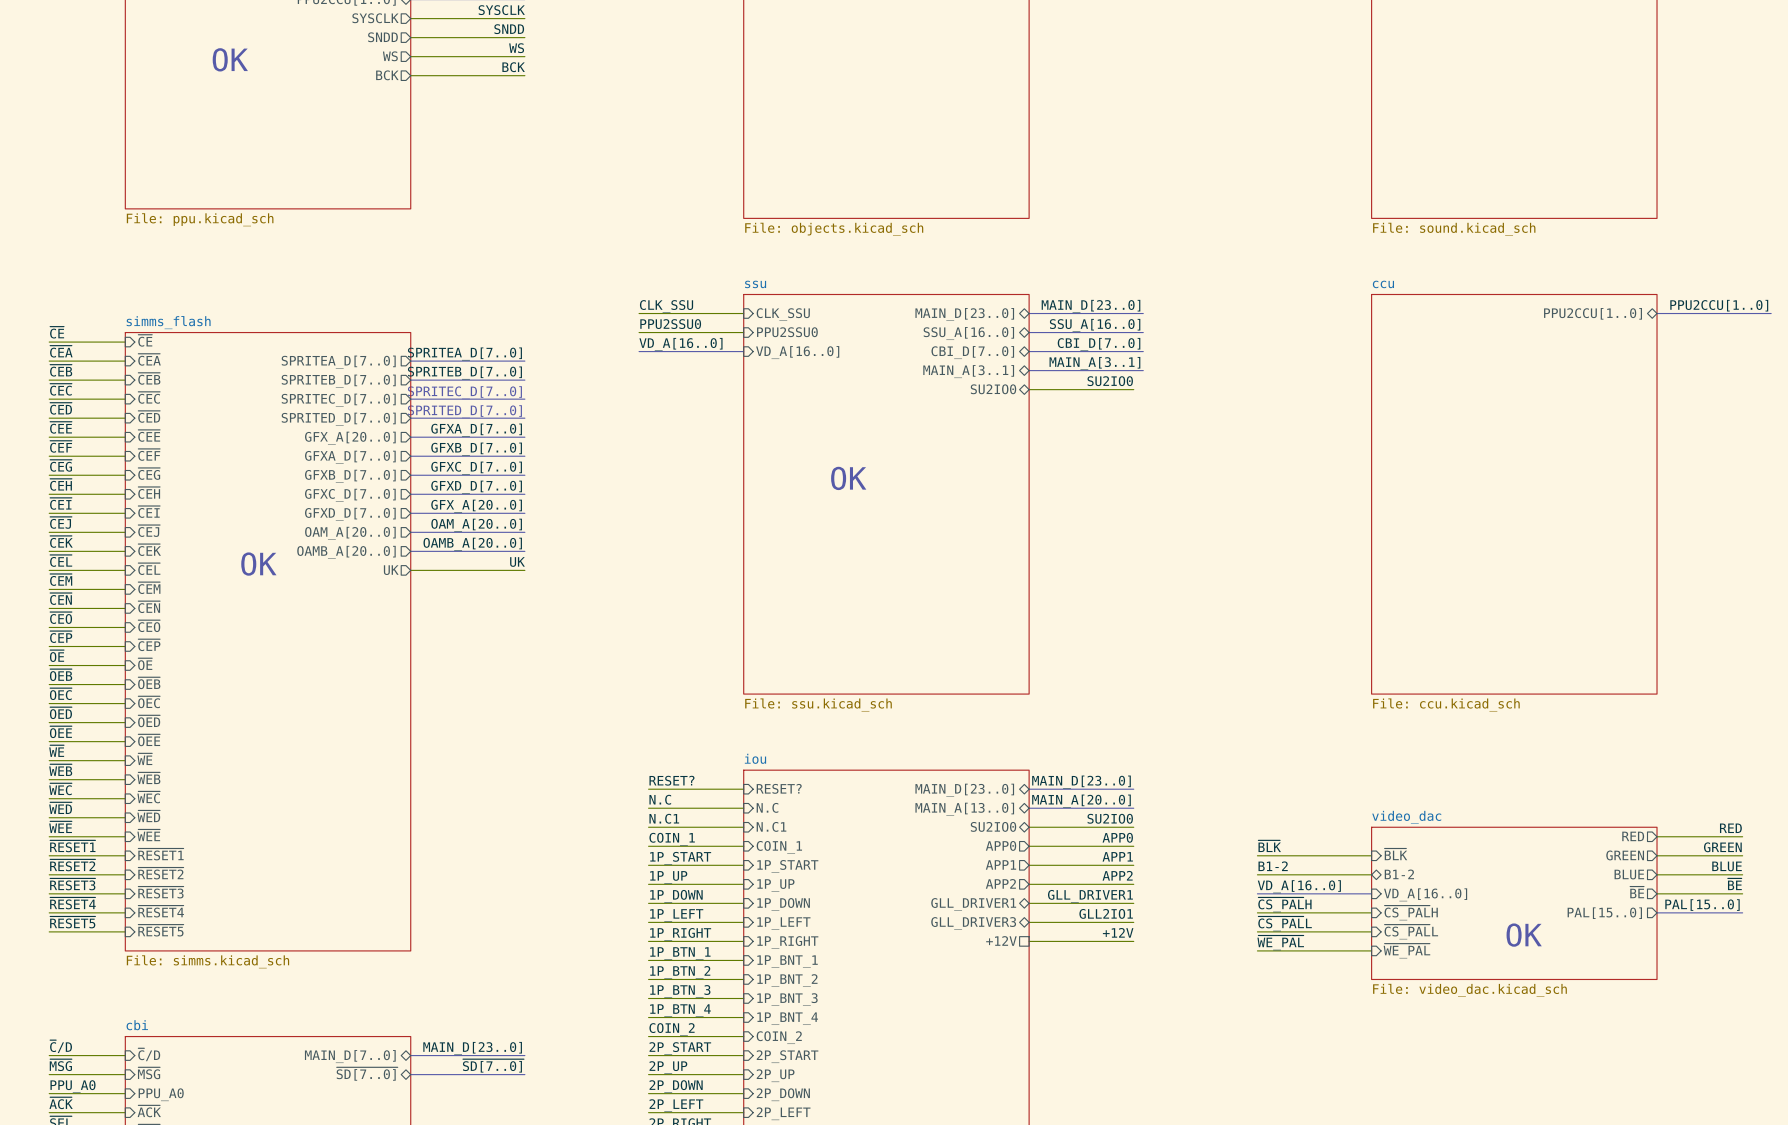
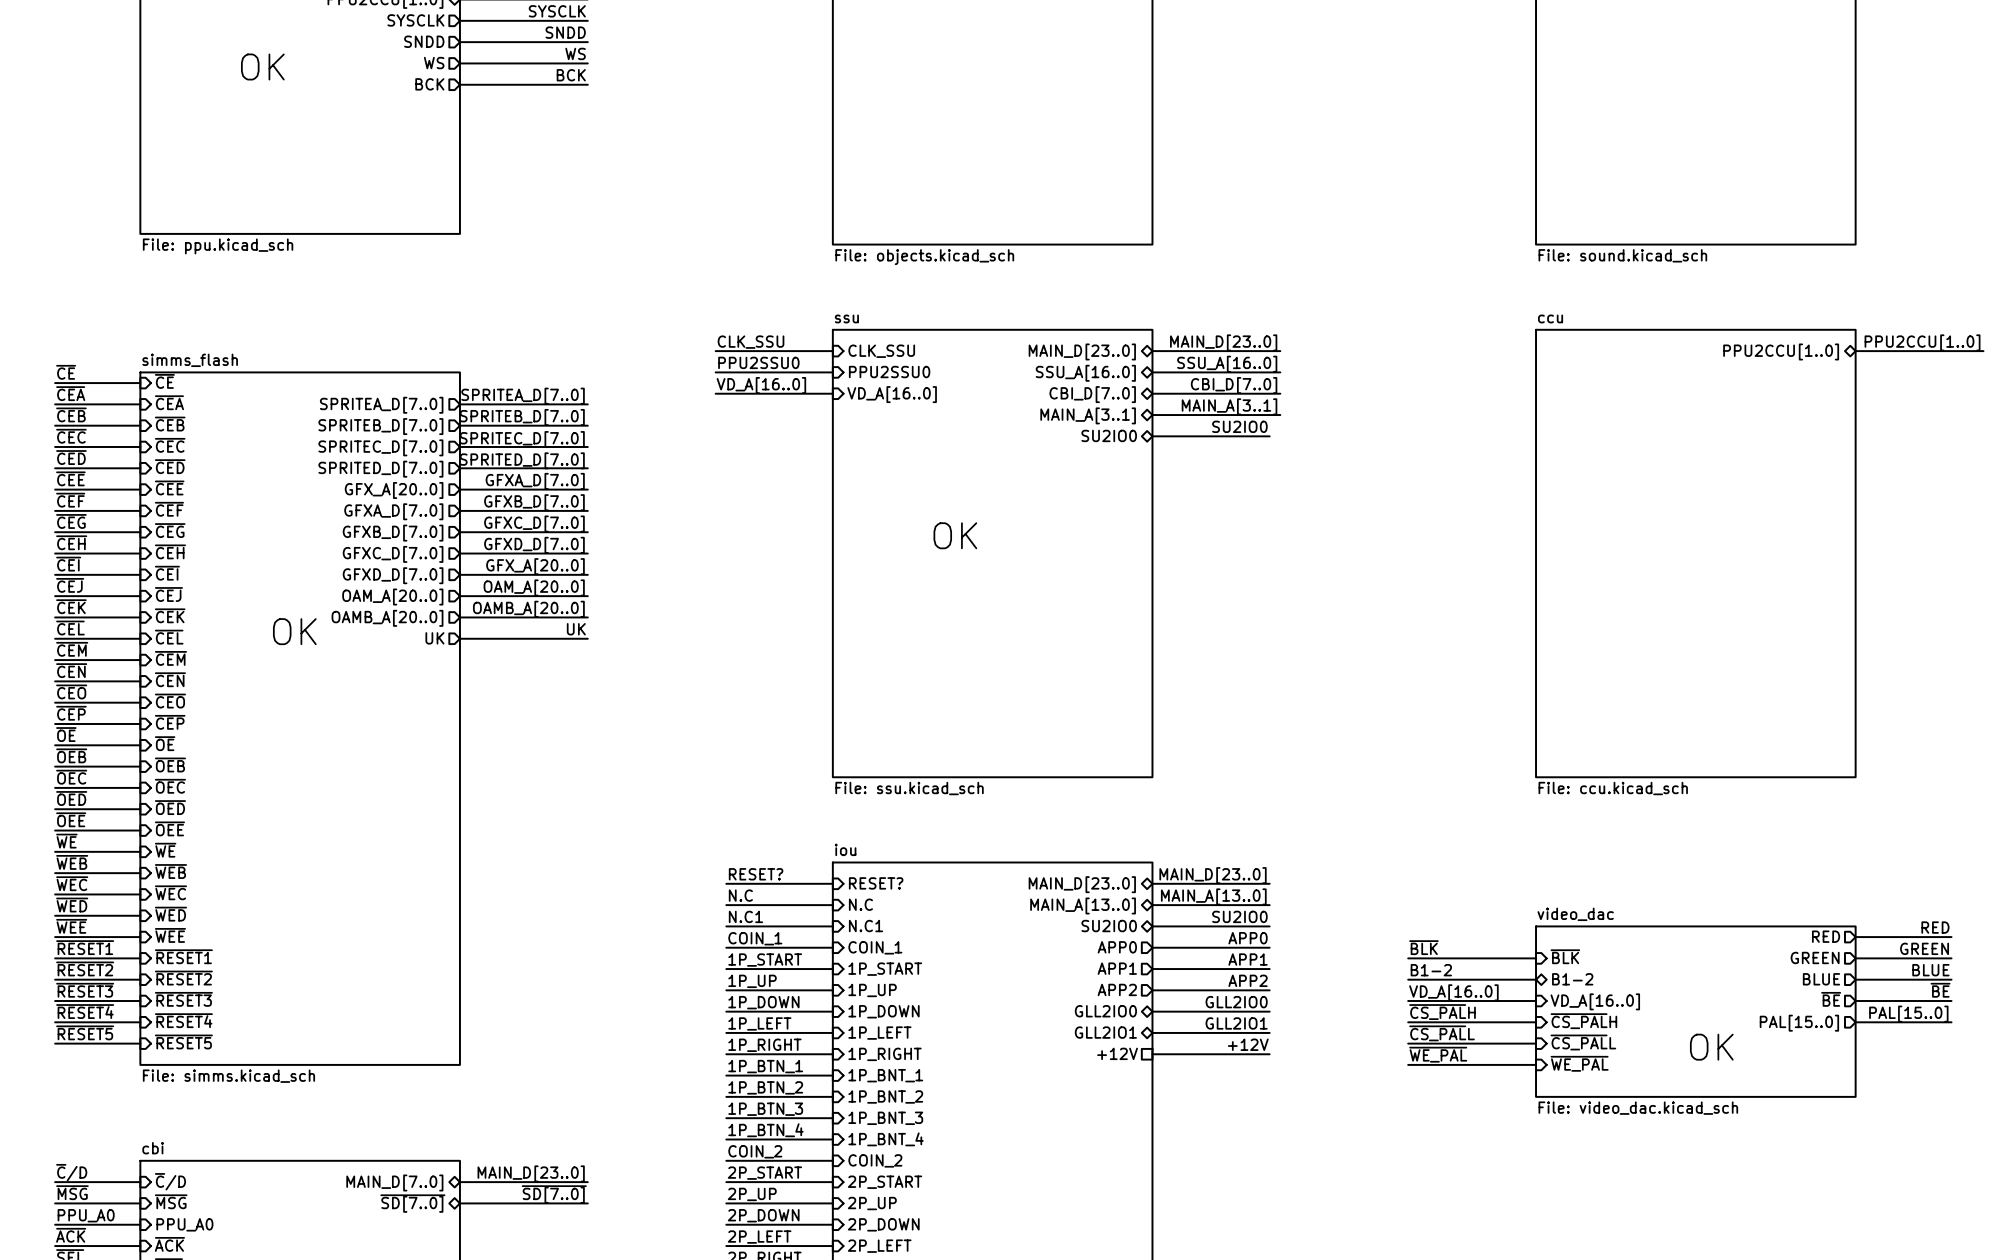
label: MAIN_A[20..0] (1081, 801) -> MAIN_A[13..0] (1213, 896)
label: GLL_DRIVER1 (1090, 896) -> GLL2IO0 (1236, 1002)
sheet pin: GLL_DRIVER1 (973, 904) -> GLL2IO0 (1105, 1011)
sheet pin: GLL_DRIVER3 (973, 923) -> GLL2IO1 (1105, 1032)

